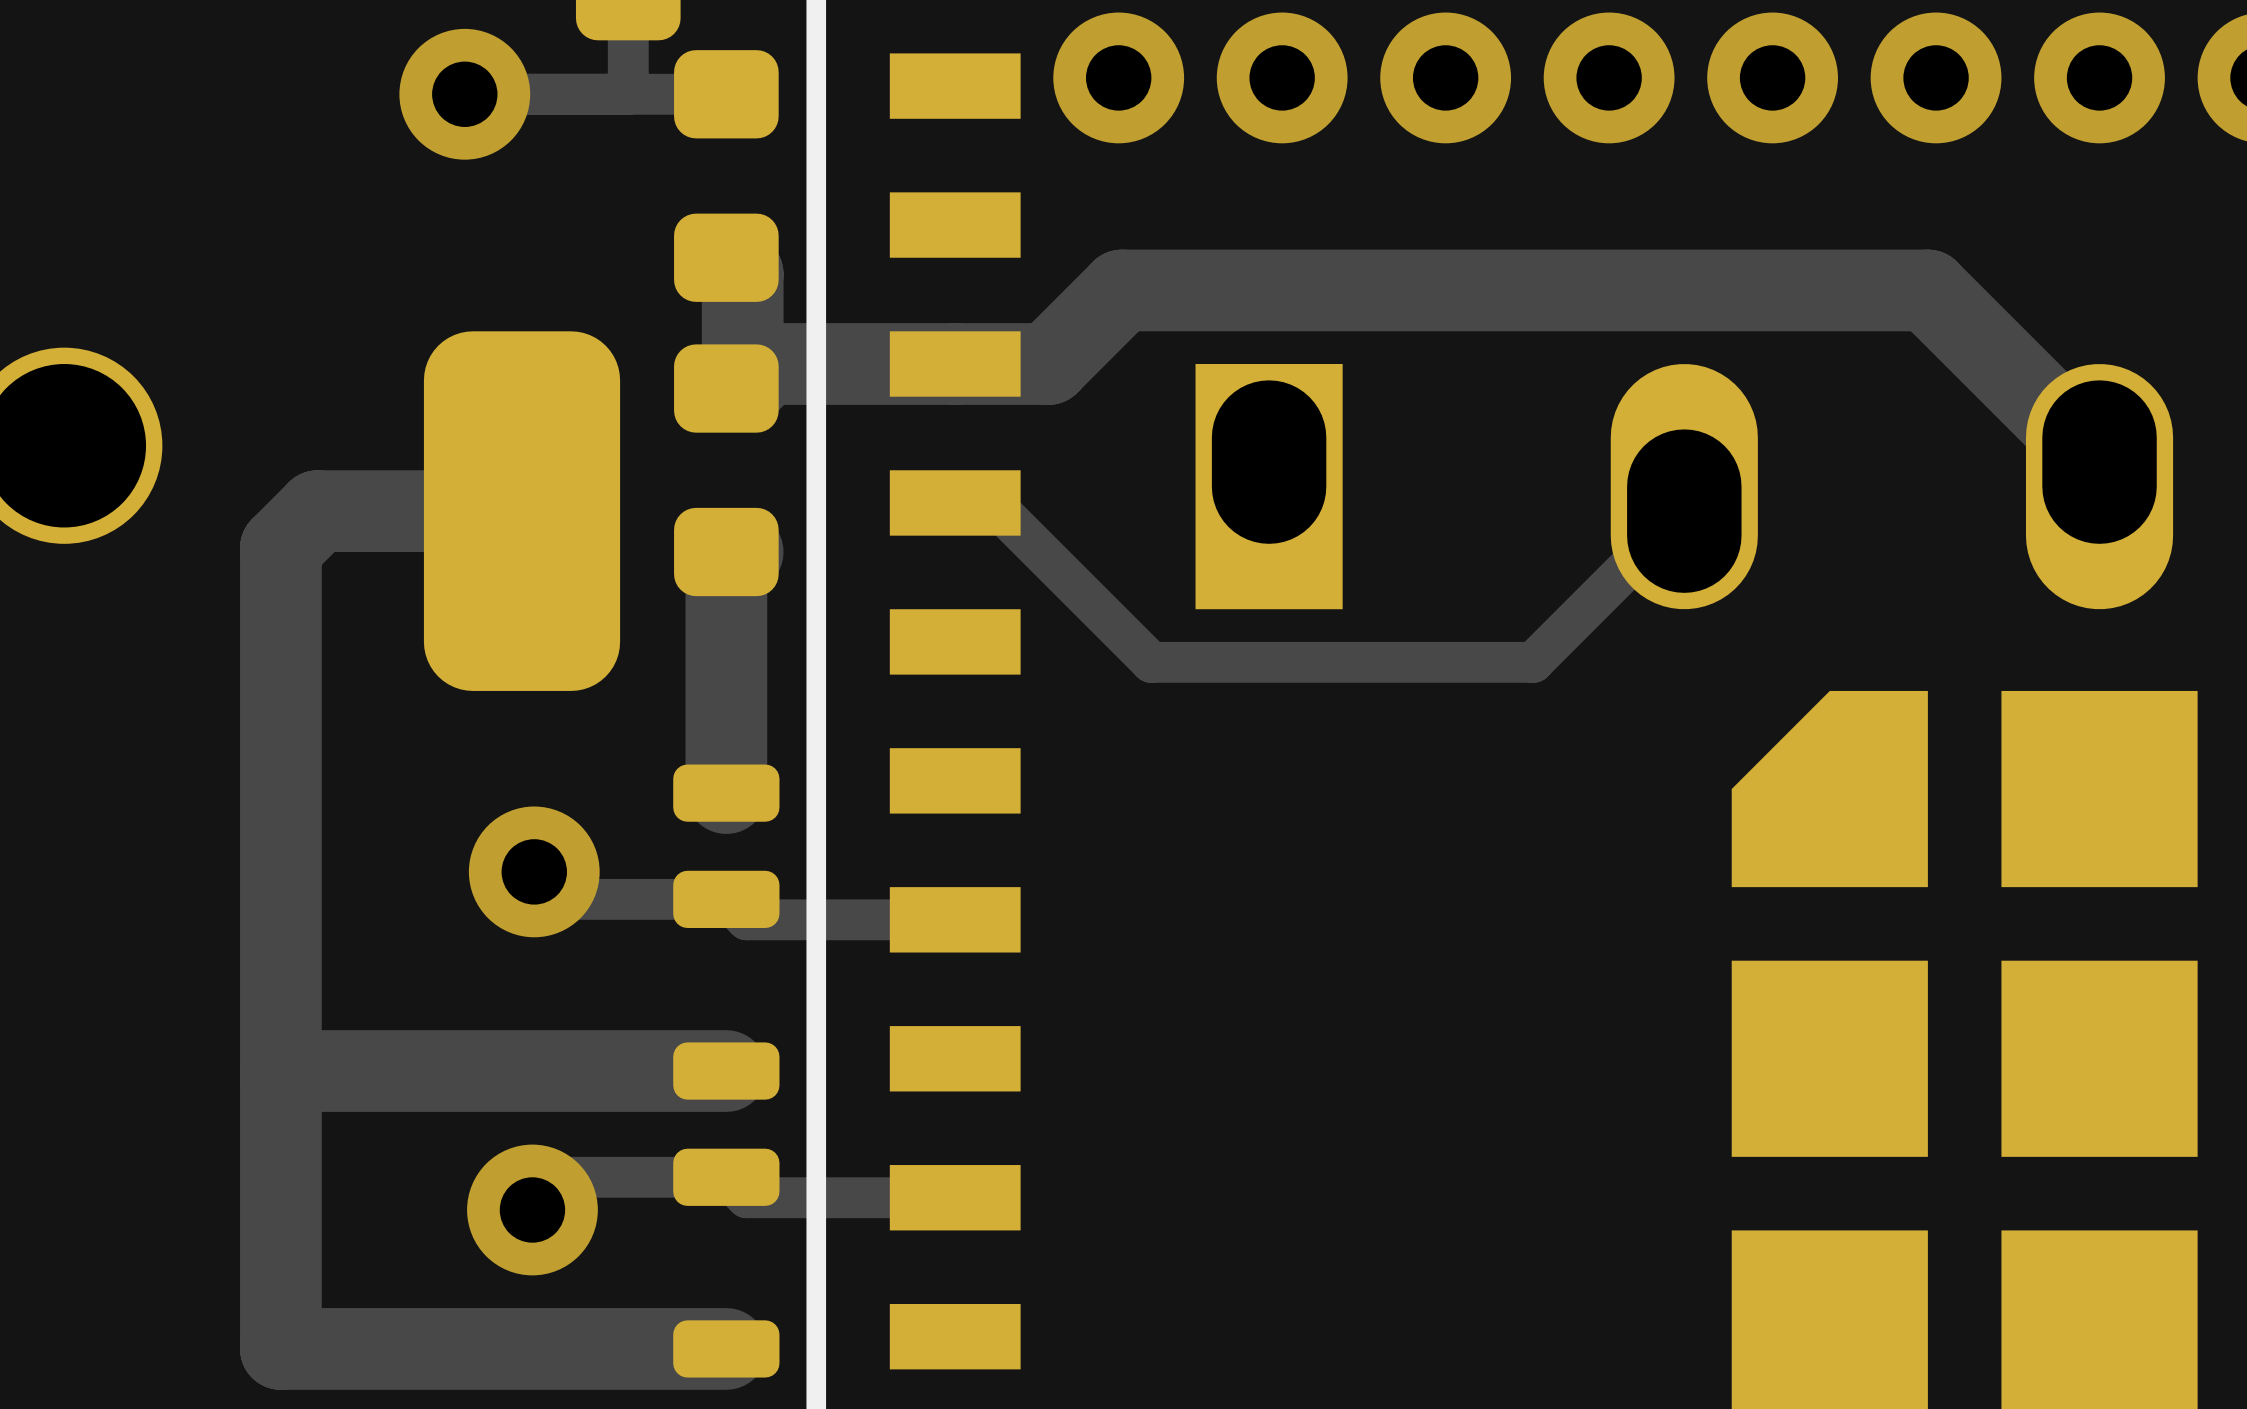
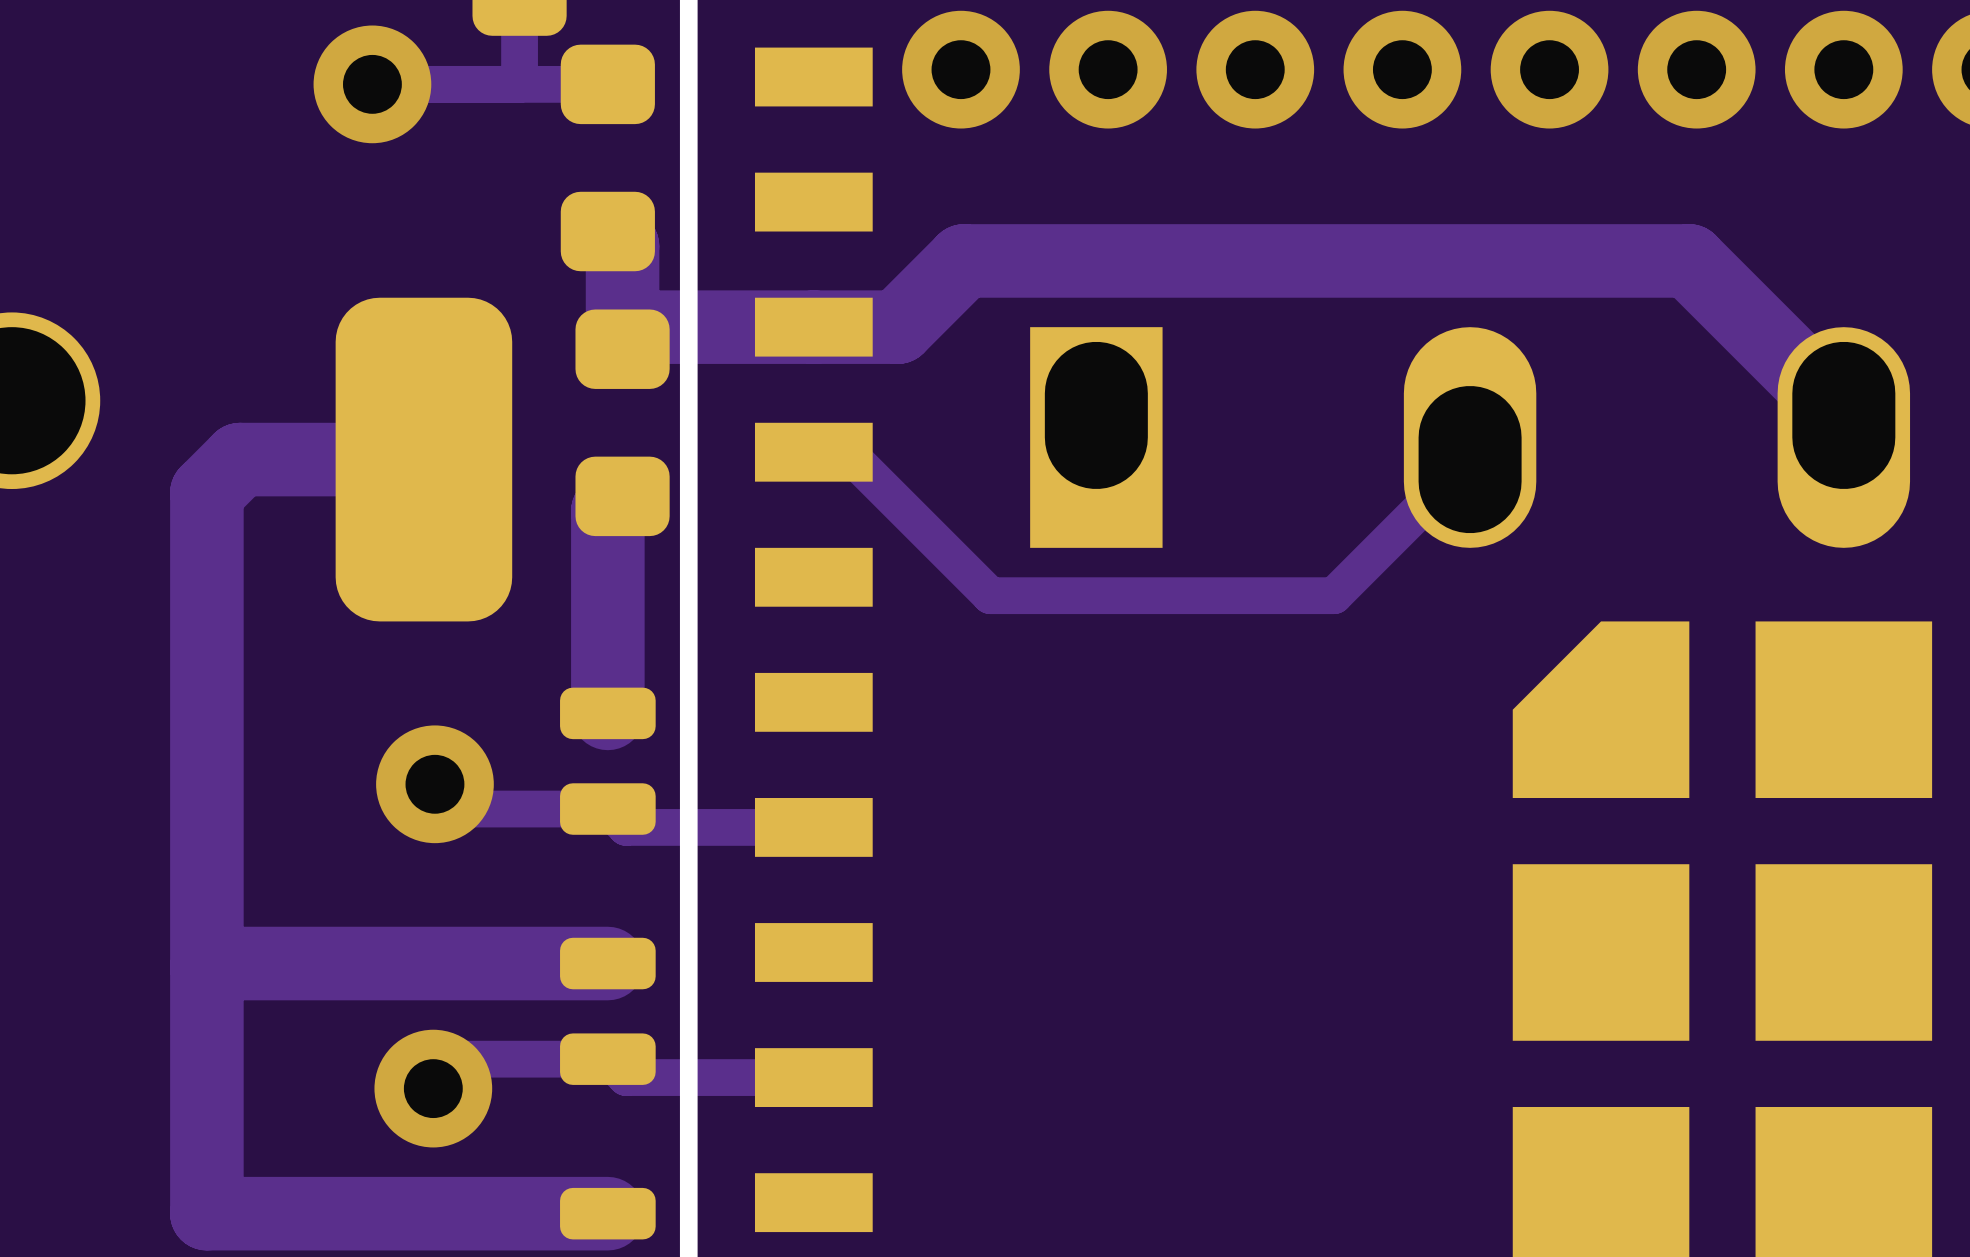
part position: (726, 470) -> (622, 422)

